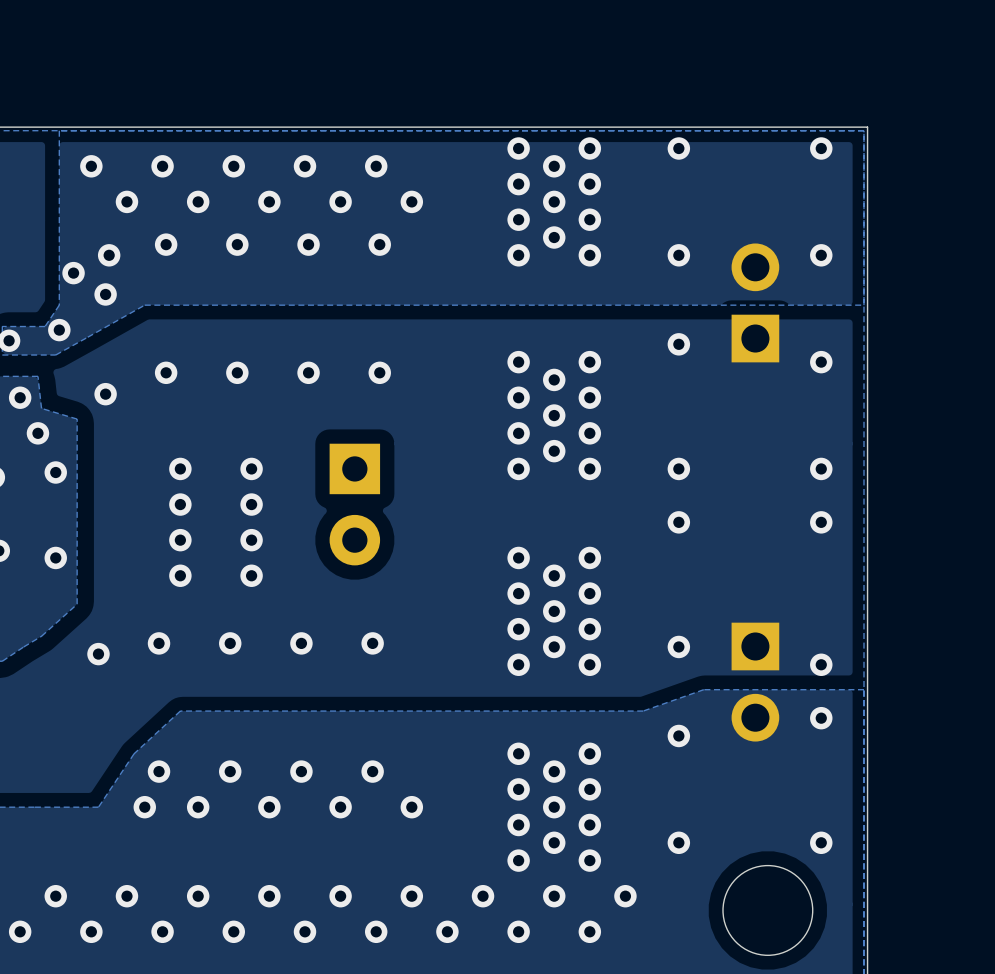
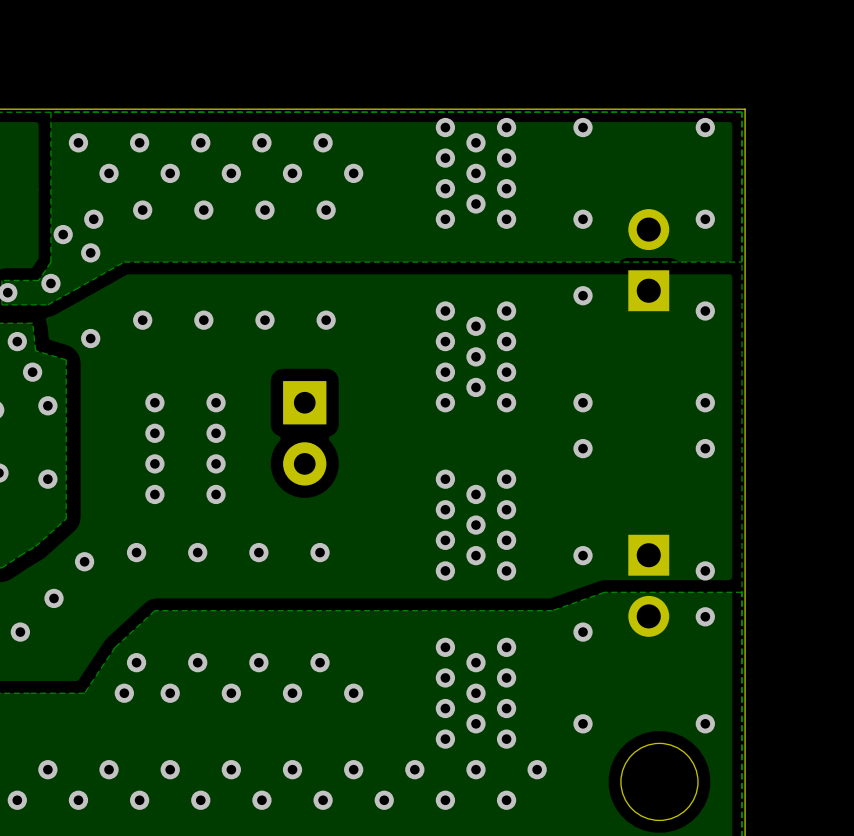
via: none -> (54, 598)
via: none -> (20, 632)

